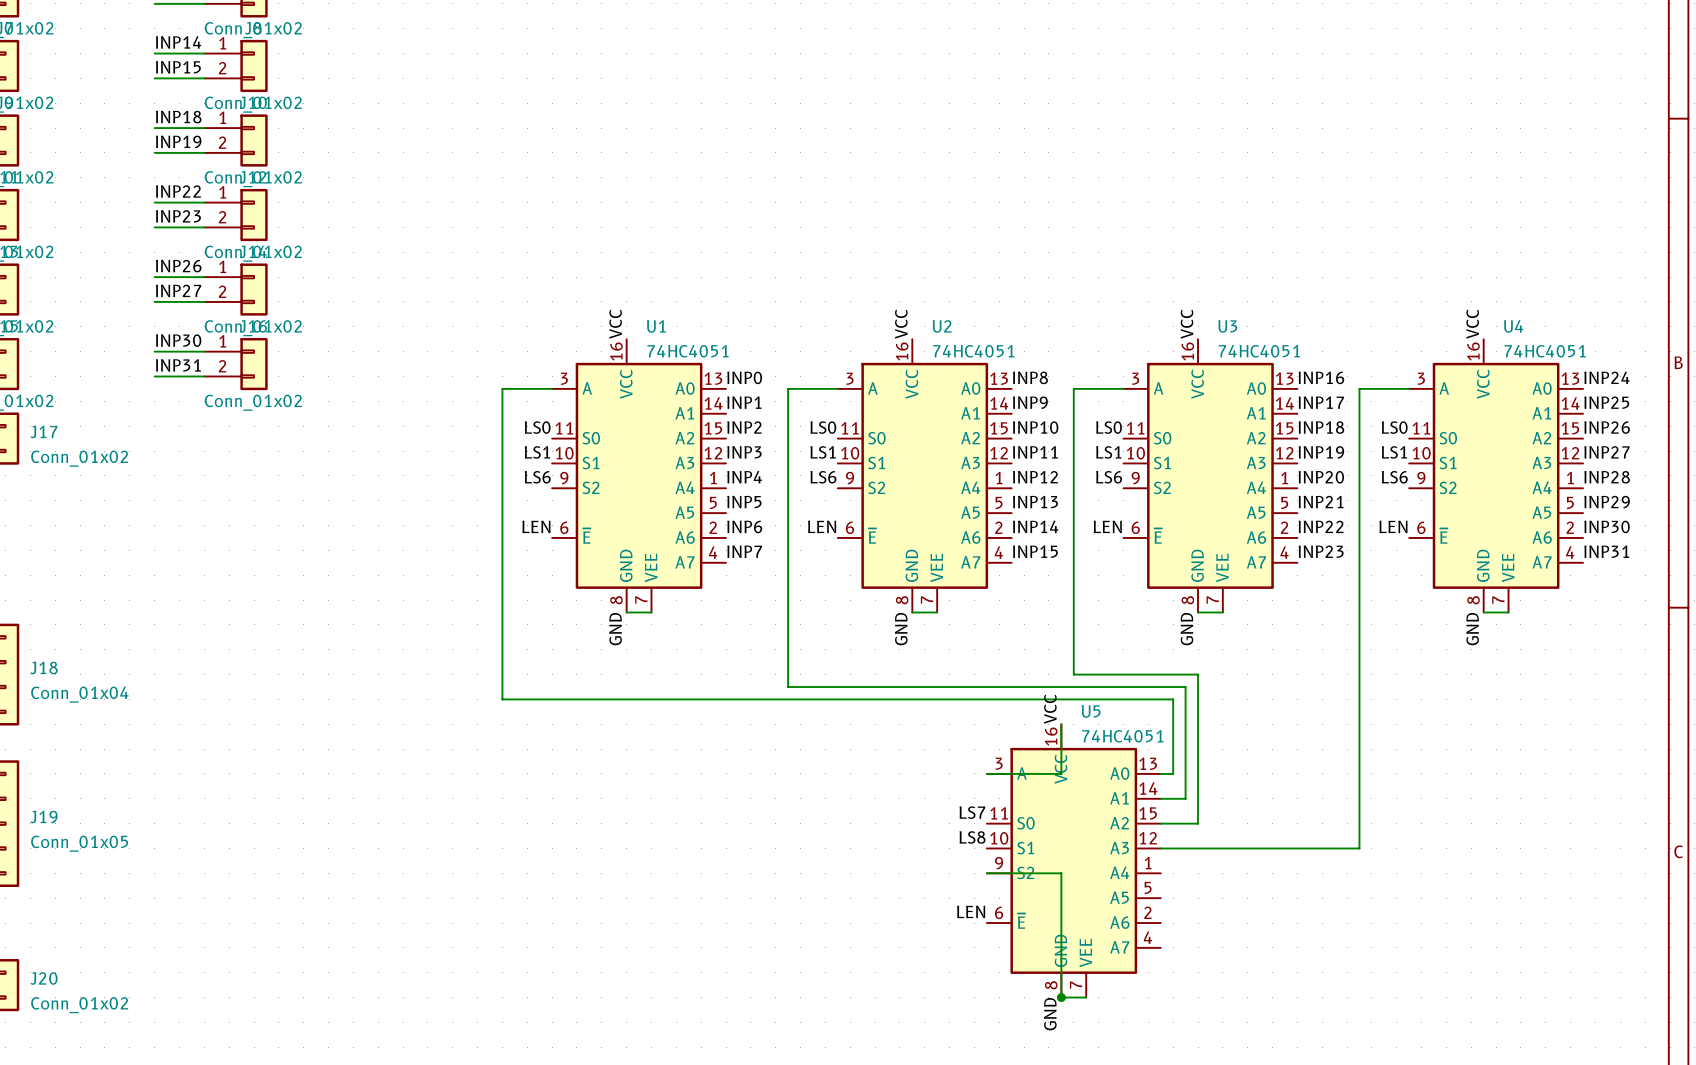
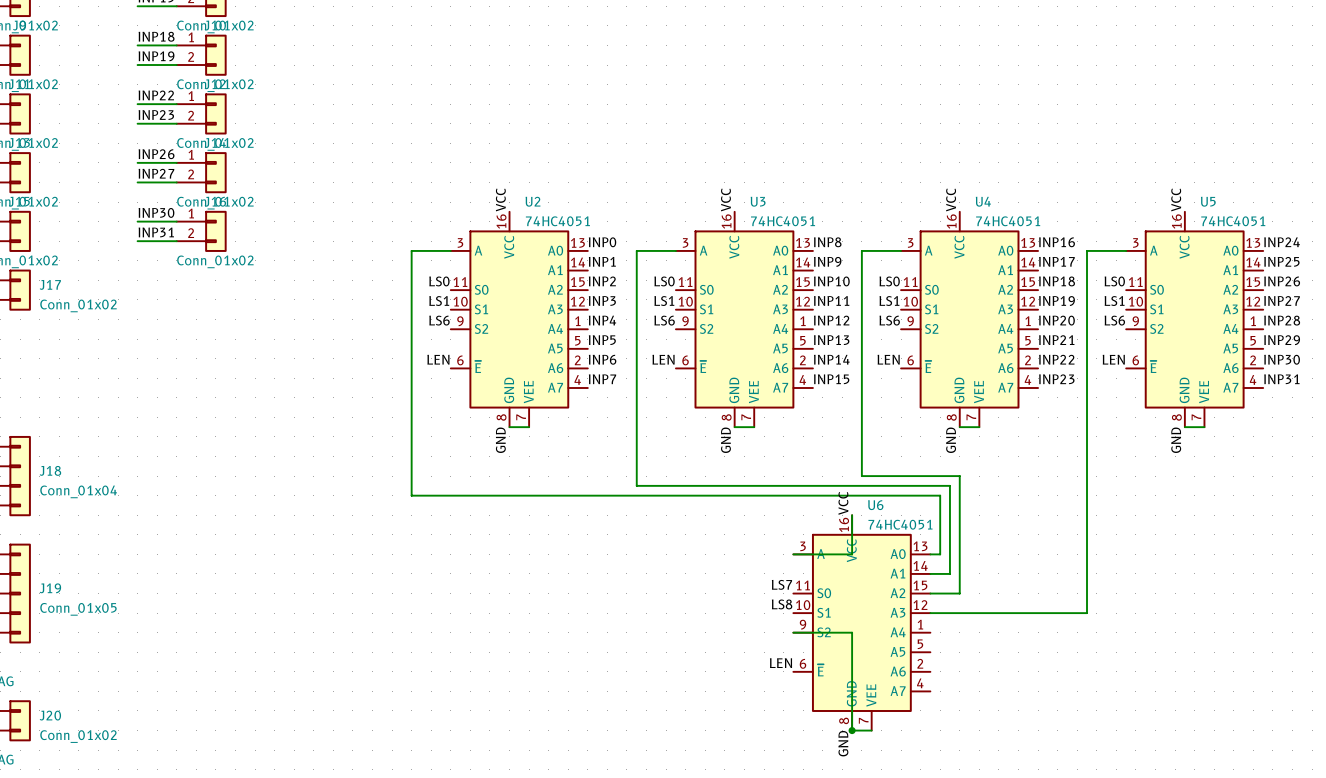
U1 name: U1 (656, 326) -> U2 (532, 201)
U2 name: U2 (942, 326) -> U3 (758, 201)
U3 name: U3 (1227, 326) -> U4 (983, 201)
U4 name: U4 (1513, 326) -> U5 (1208, 201)
U5 name: U5 (1091, 711) -> U6 (875, 505)

